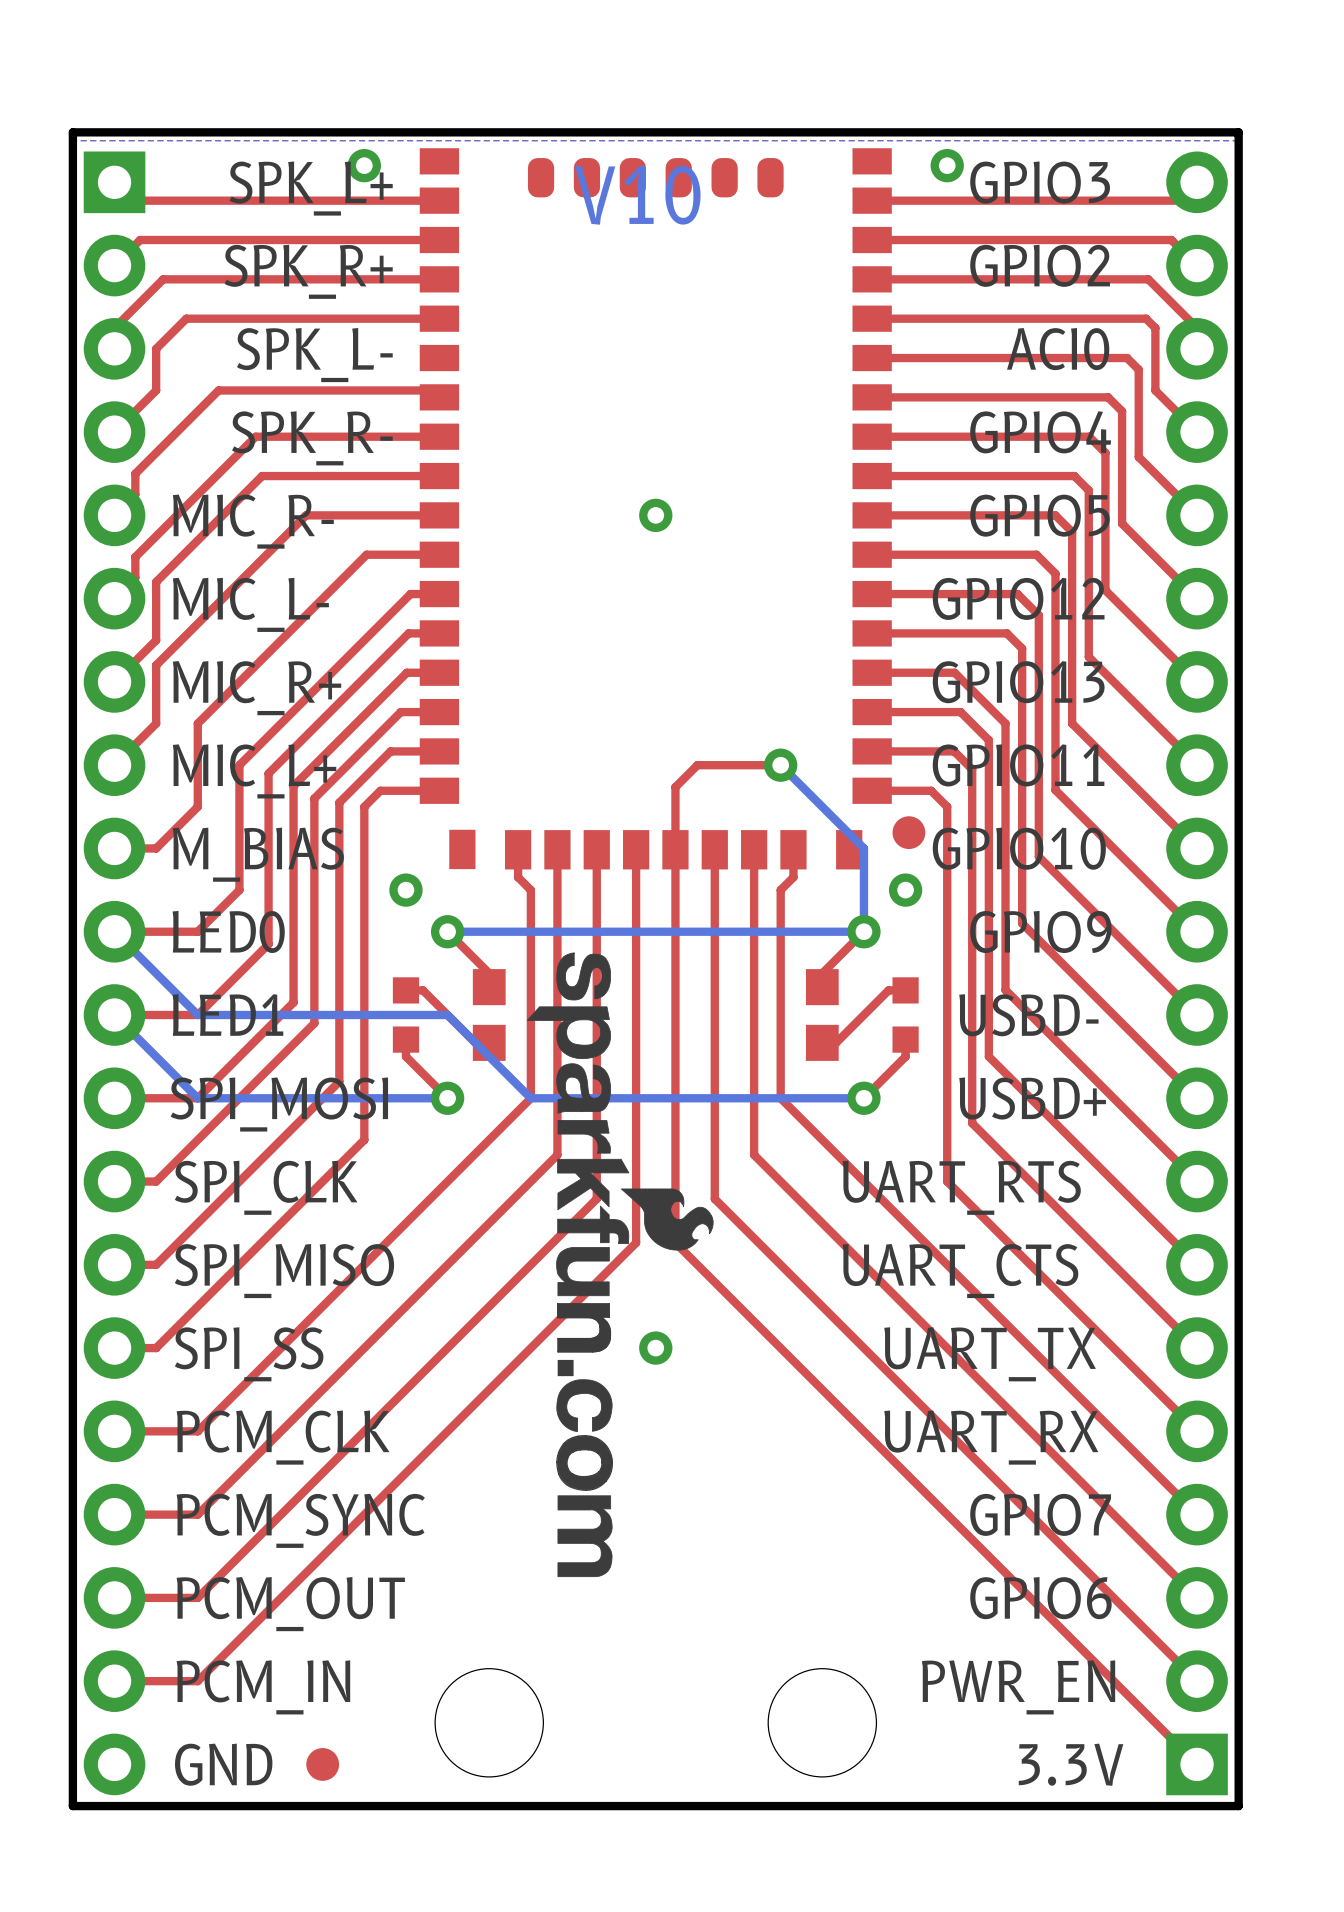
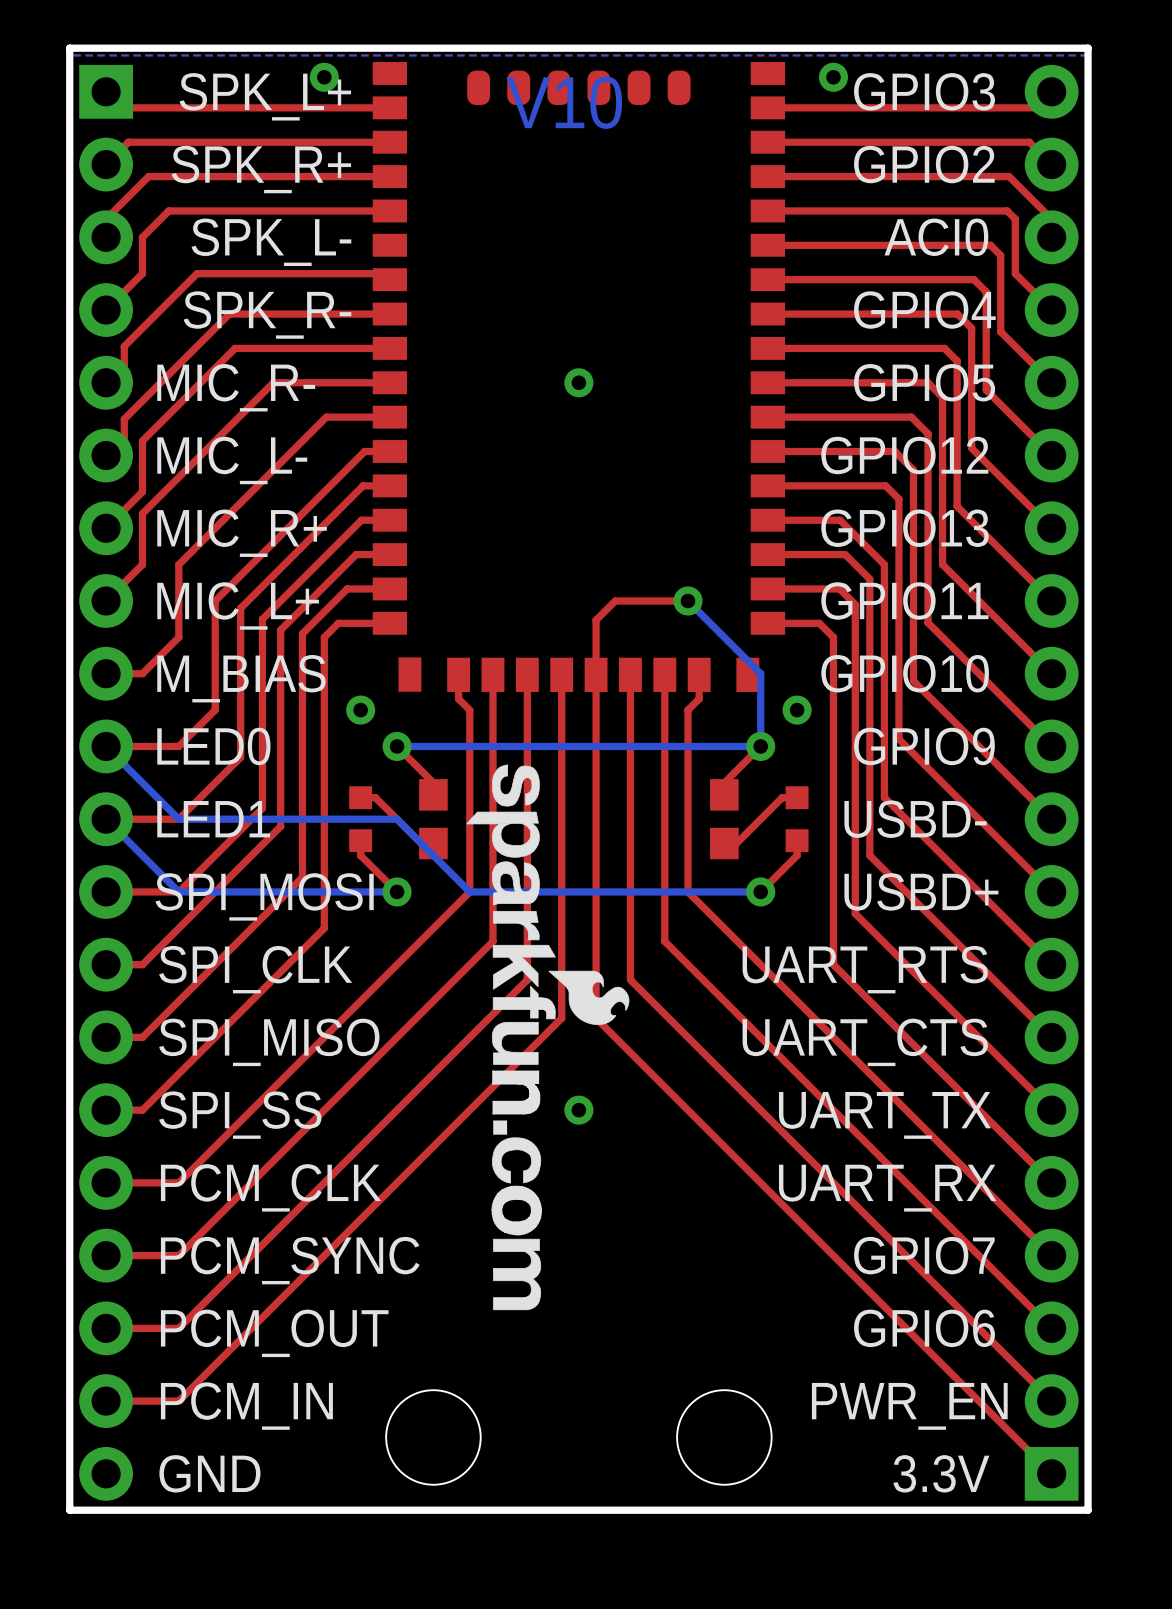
part: (908, 832) -> none
part: (322, 1764) -> none

